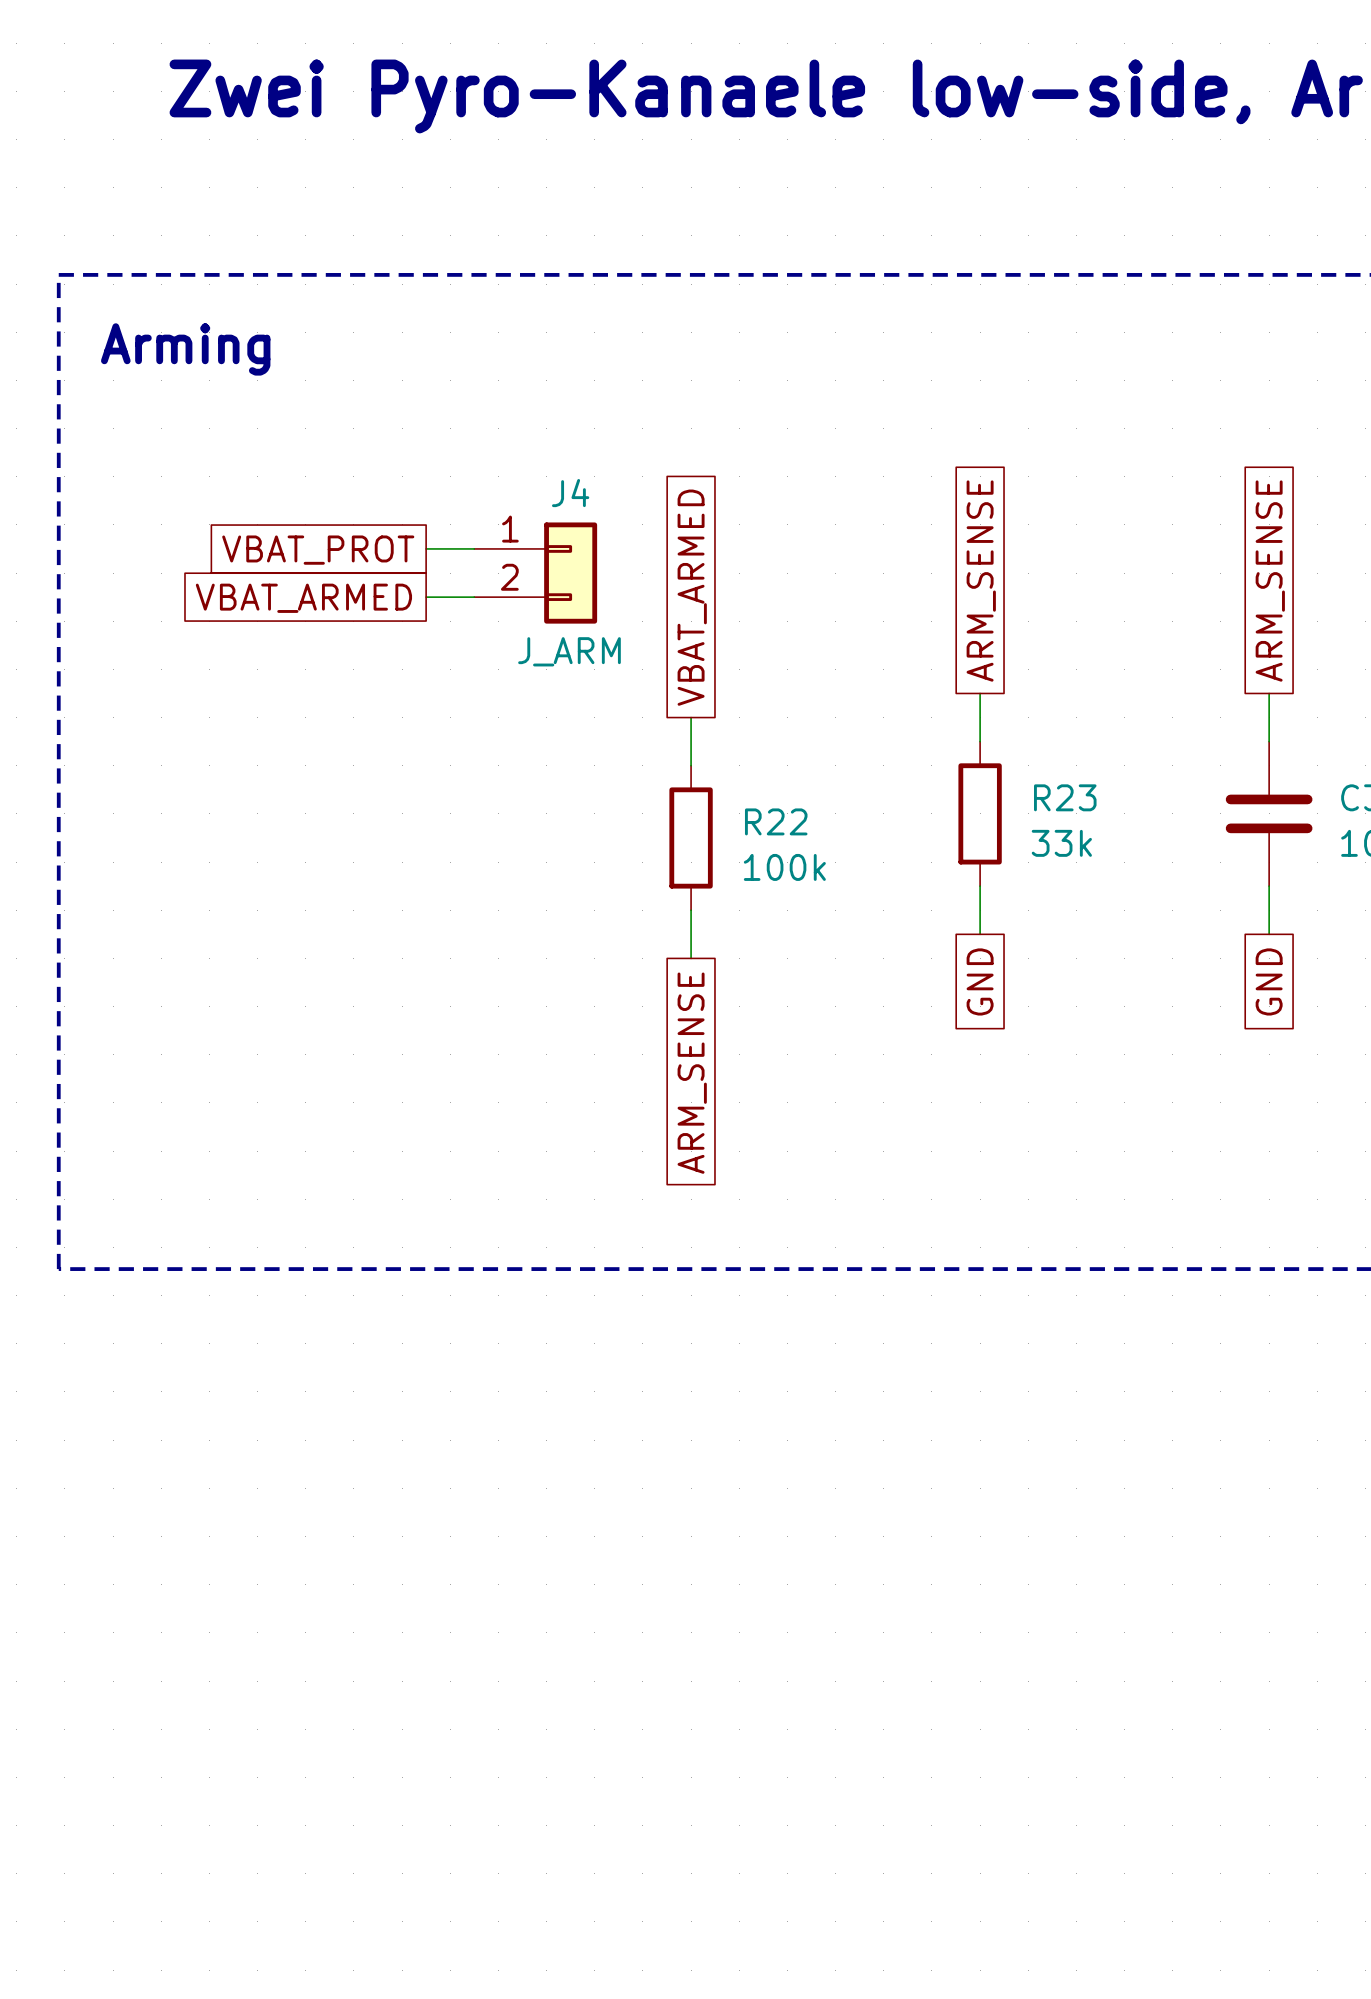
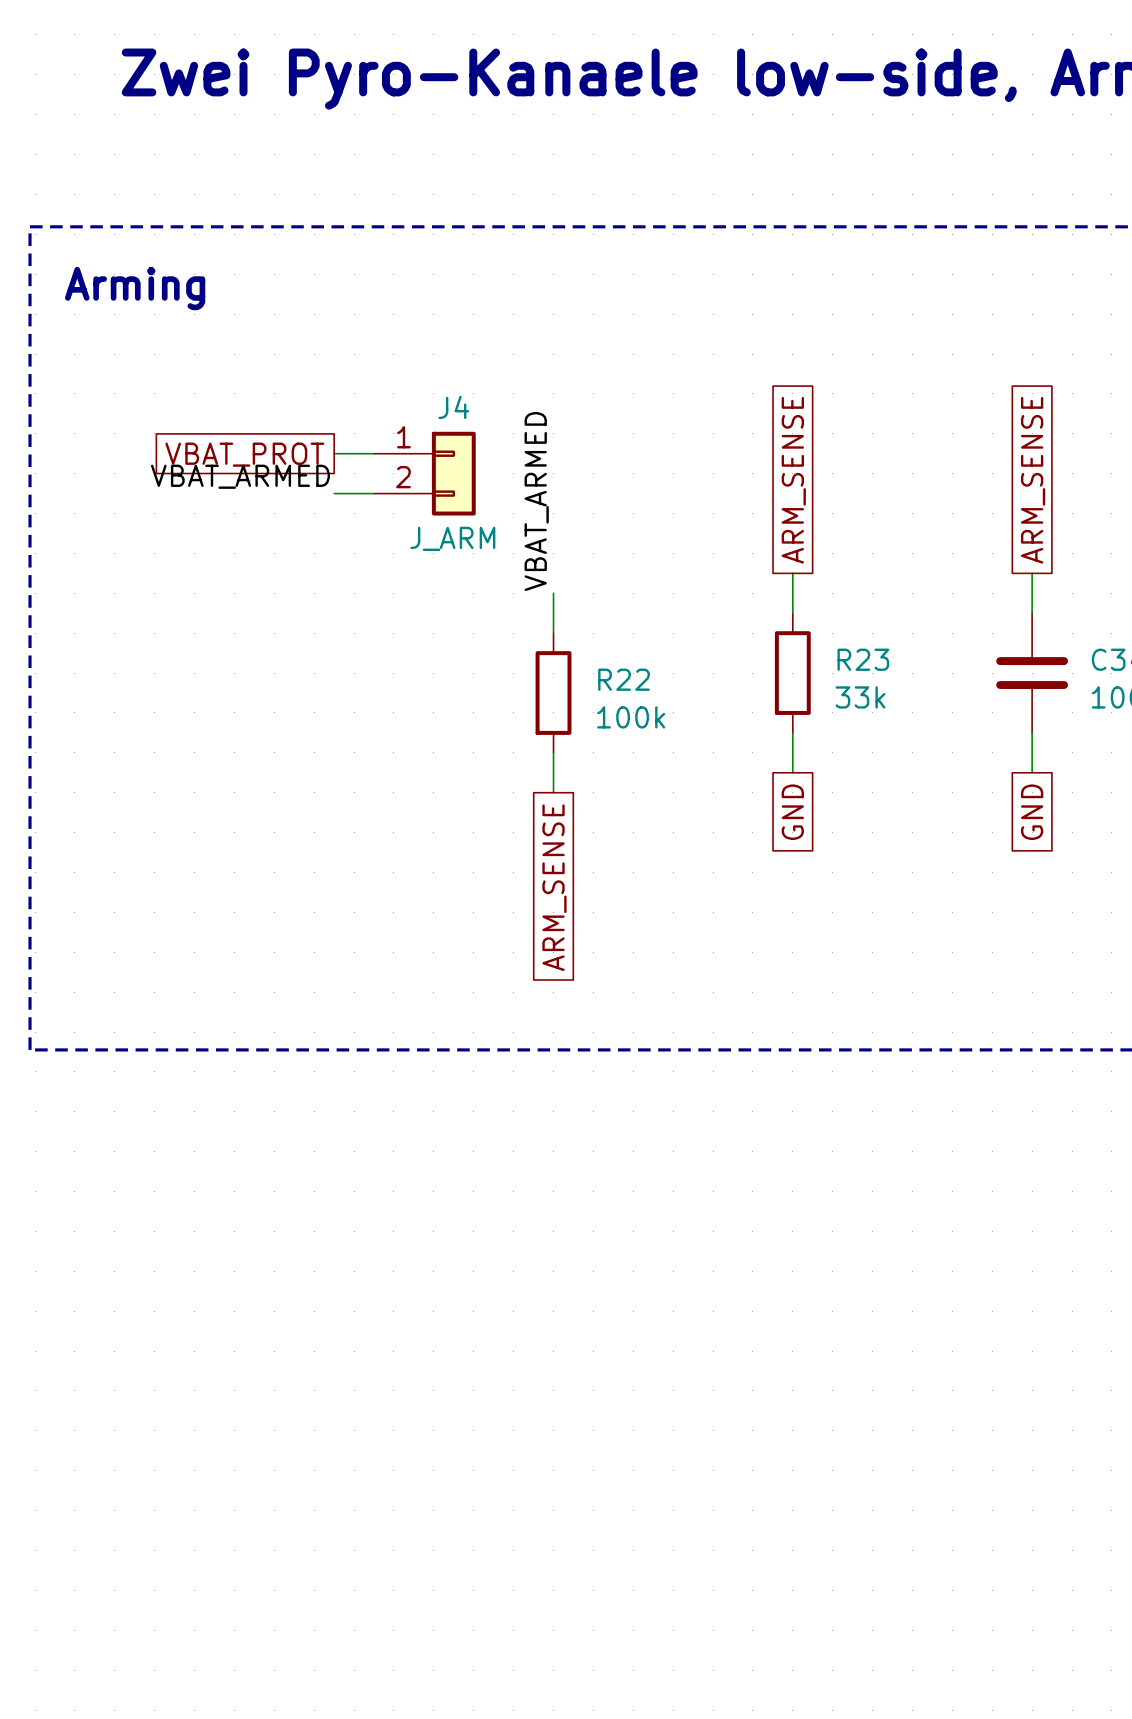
label: none -> VBAT_ARMED (240, 476)
global label: VBAT_ARMED (692, 597) -> none
global label: VBAT_ARMED (303, 598) -> none
label: none -> VBAT_ARMED (536, 501)

